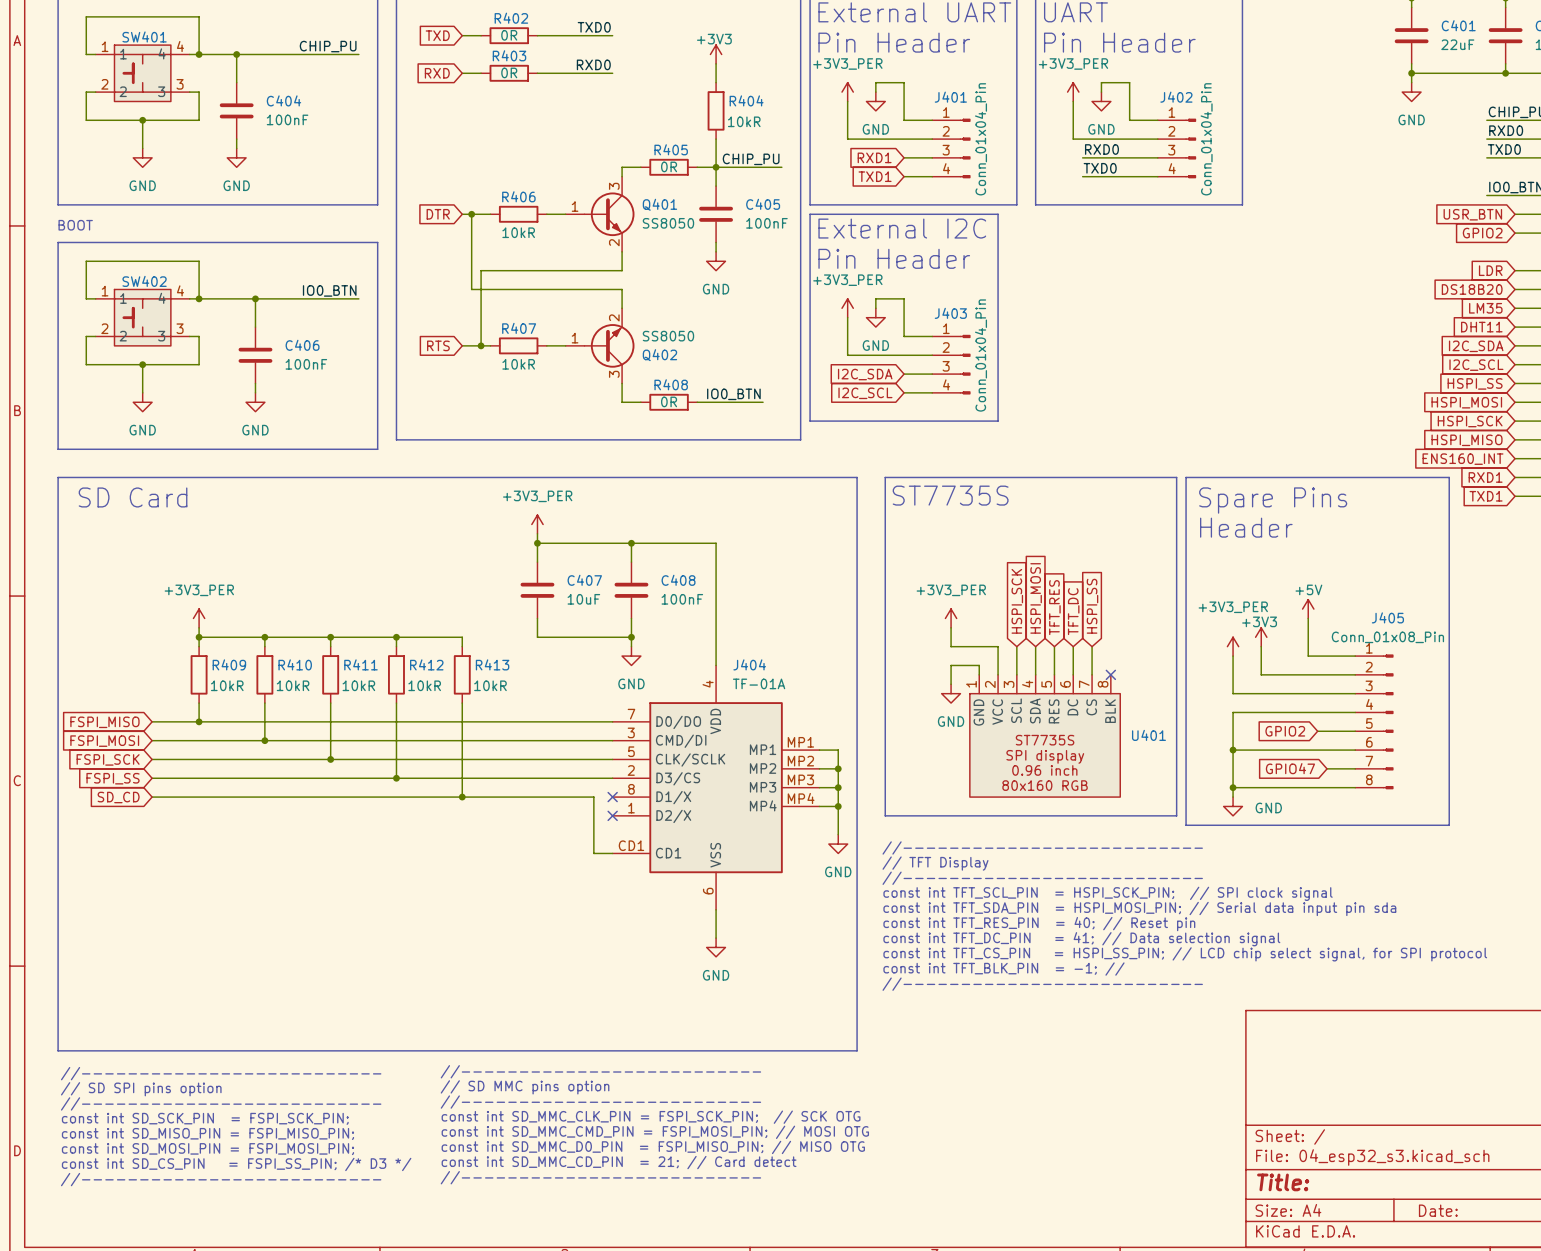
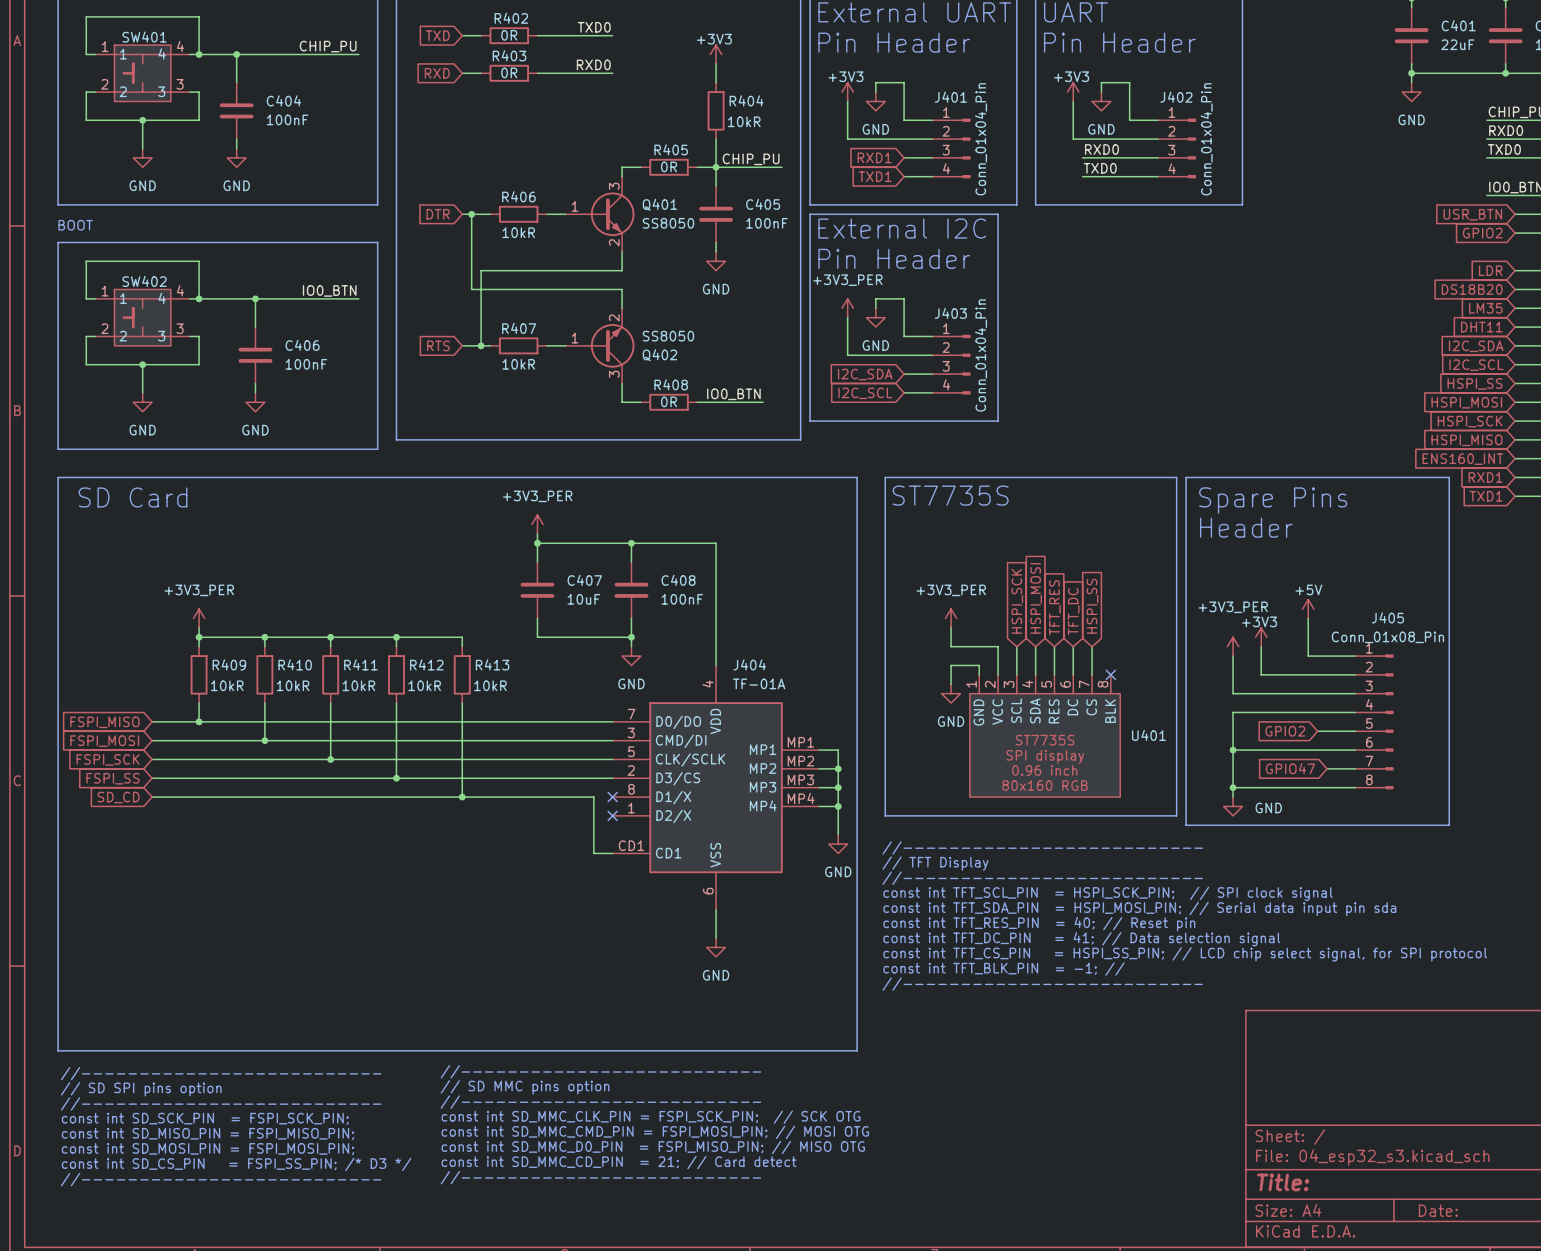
power symbol: +3V3_PER (847, 92) -> +3V3 (847, 92)
power symbol: +3V3_PER (1073, 92) -> +3V3 (1073, 92)

